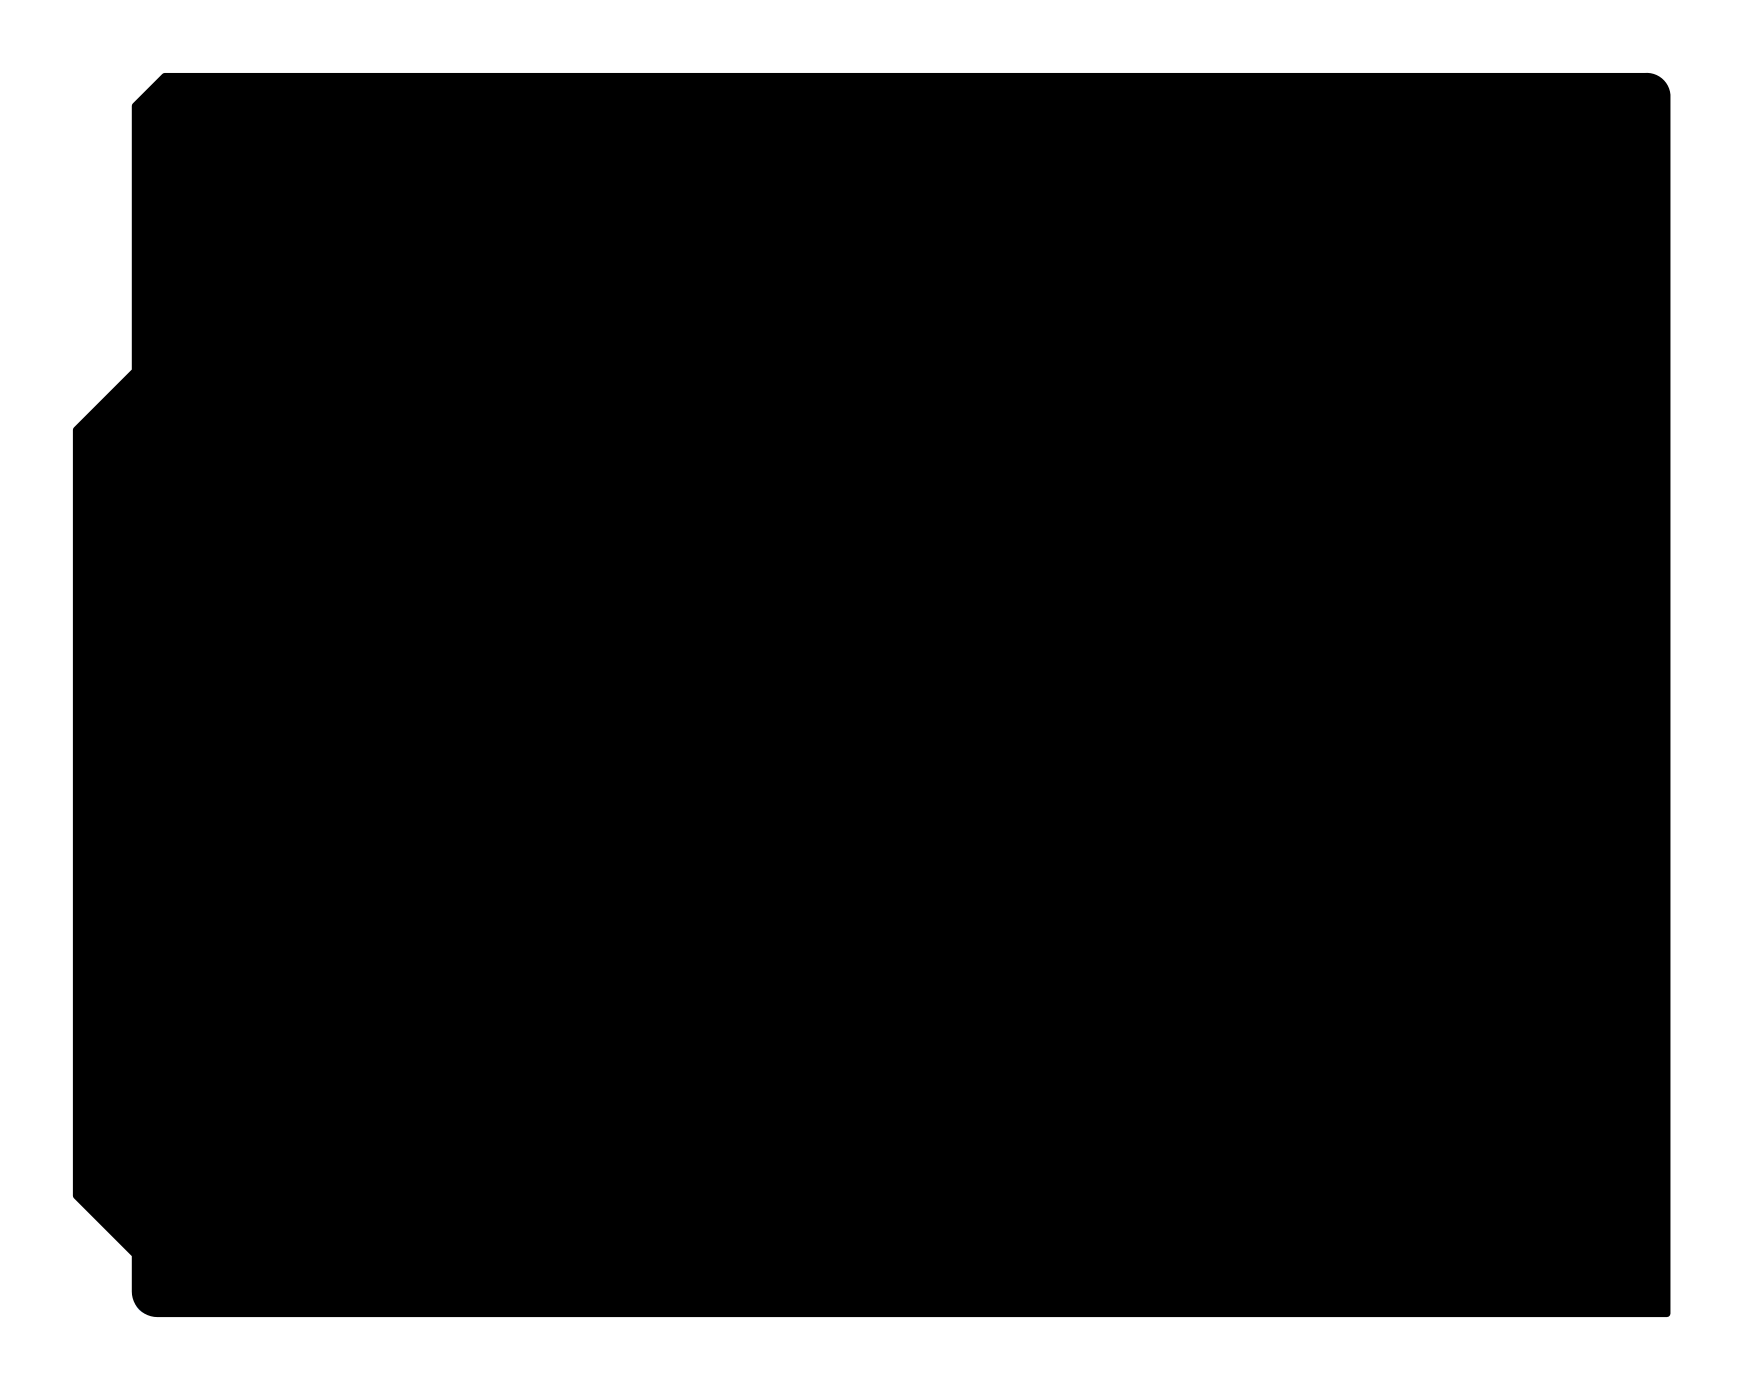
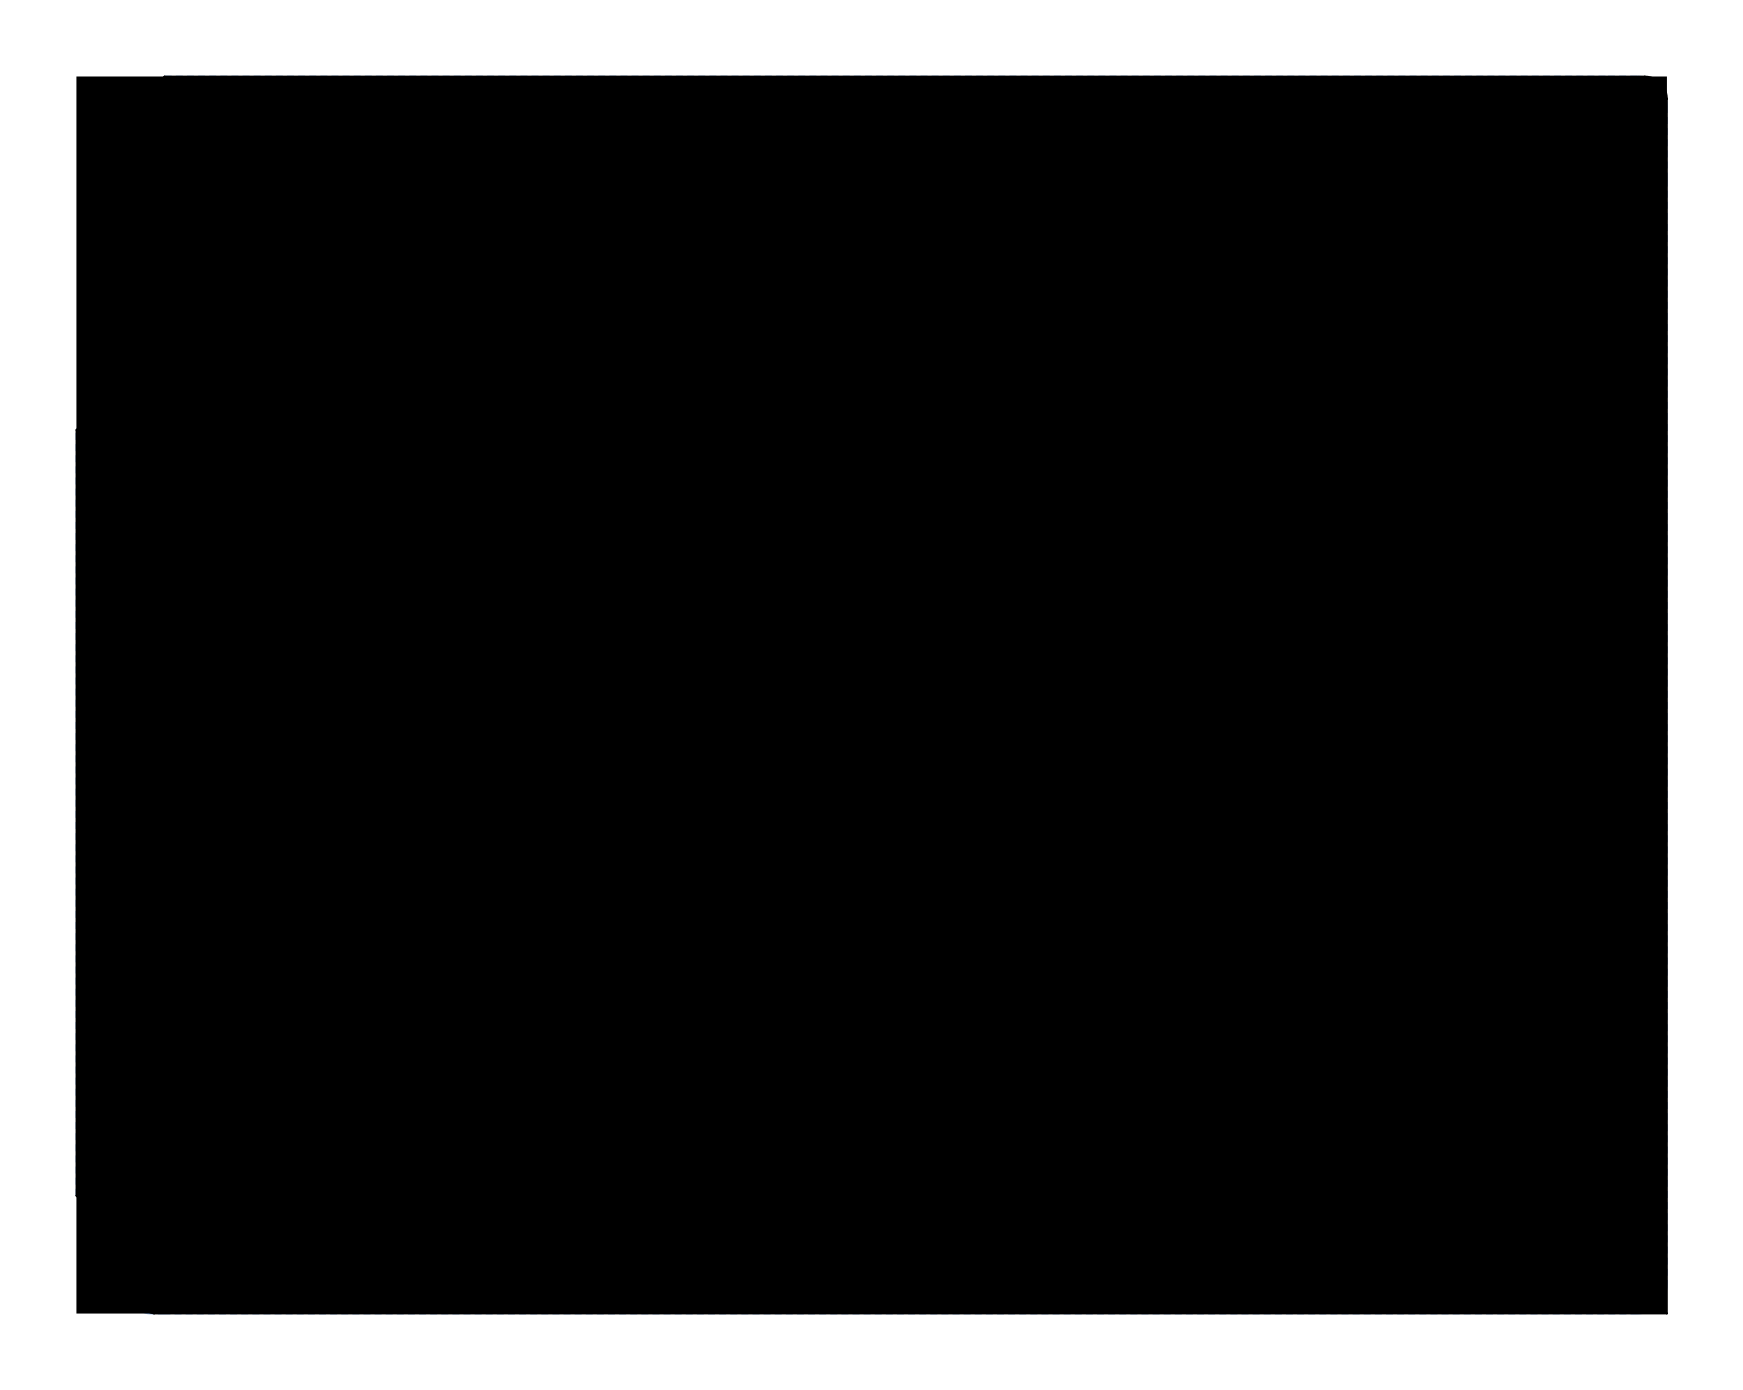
drawing shape: [72, 72, 1671, 1318] -> [76, 76, 1667, 1314]

